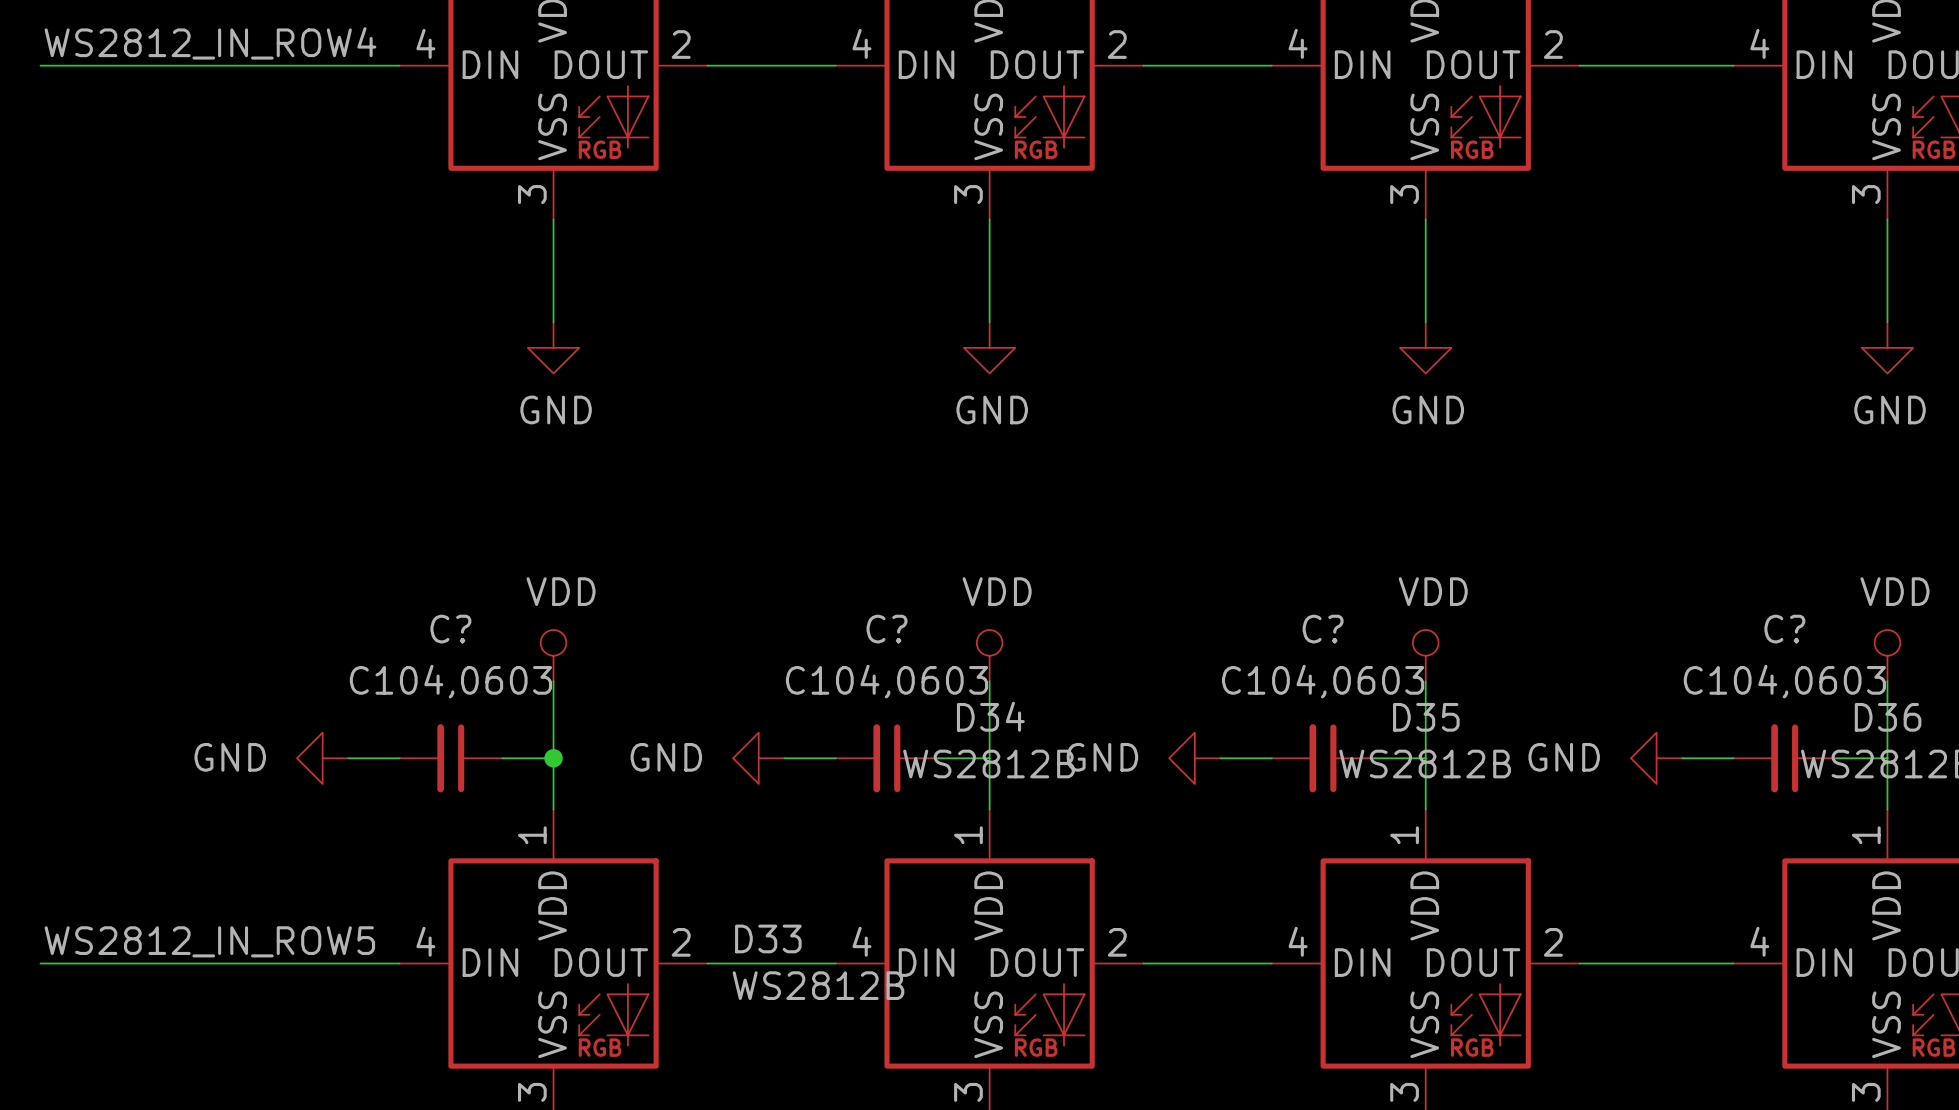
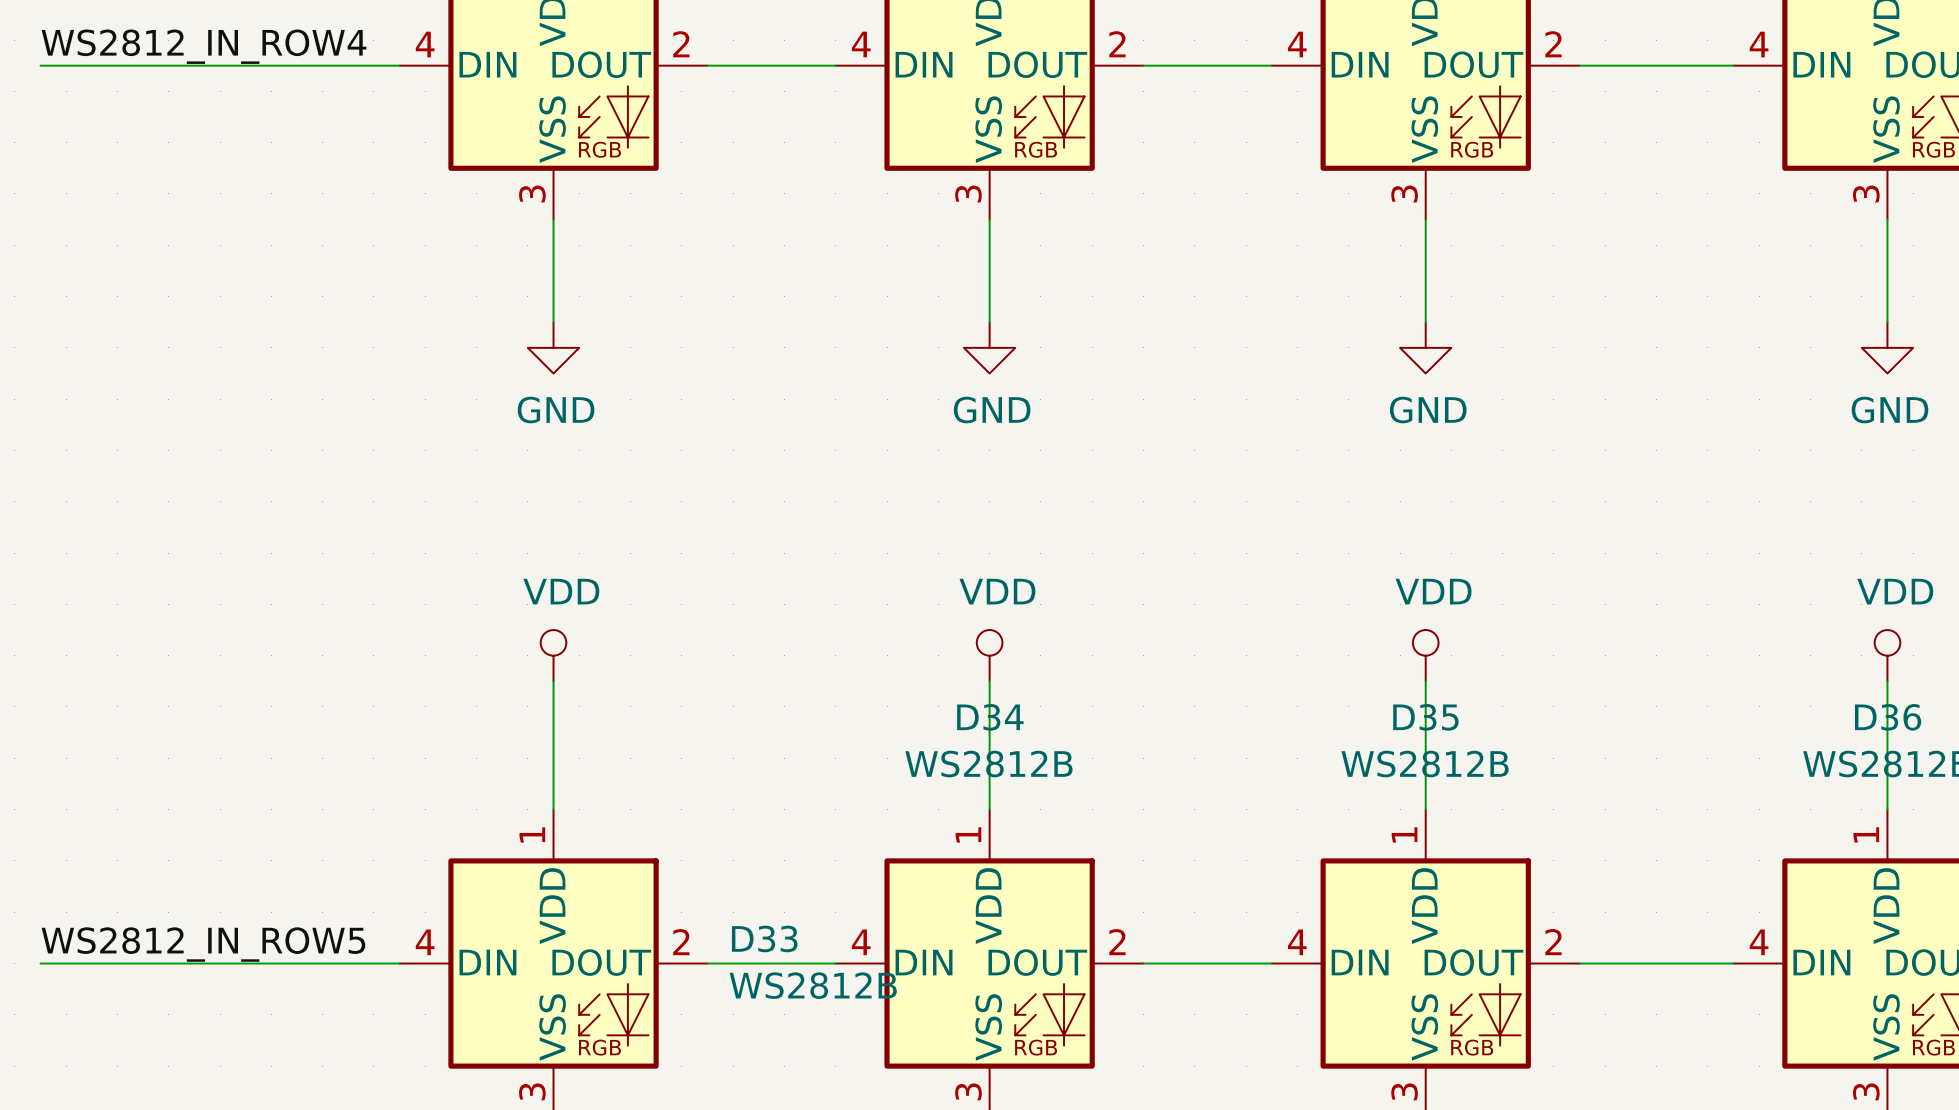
power symbol: GND (322, 758) -> none
wire: (348, 758) (399, 758) -> none
C?: C104,0603 (450, 758) -> none
wire: (502, 758) (553, 758) -> none
junction: (553, 758) -> none
power symbol: GND (758, 758) -> none
wire: (784, 758) (835, 758) -> none
C?: C104,0603 (887, 758) -> none
wire: (938, 758) (989, 758) -> none
power symbol: GND (1194, 758) -> none
wire: (1220, 758) (1271, 758) -> none
C?: C104,0603 (1323, 758) -> none
wire: (1374, 758) (1425, 758) -> none
power symbol: GND (1656, 758) -> none
wire: (1682, 758) (1733, 758) -> none
C?: C104,0603 (1784, 758) -> none
wire: (1836, 758) (1887, 758) -> none

